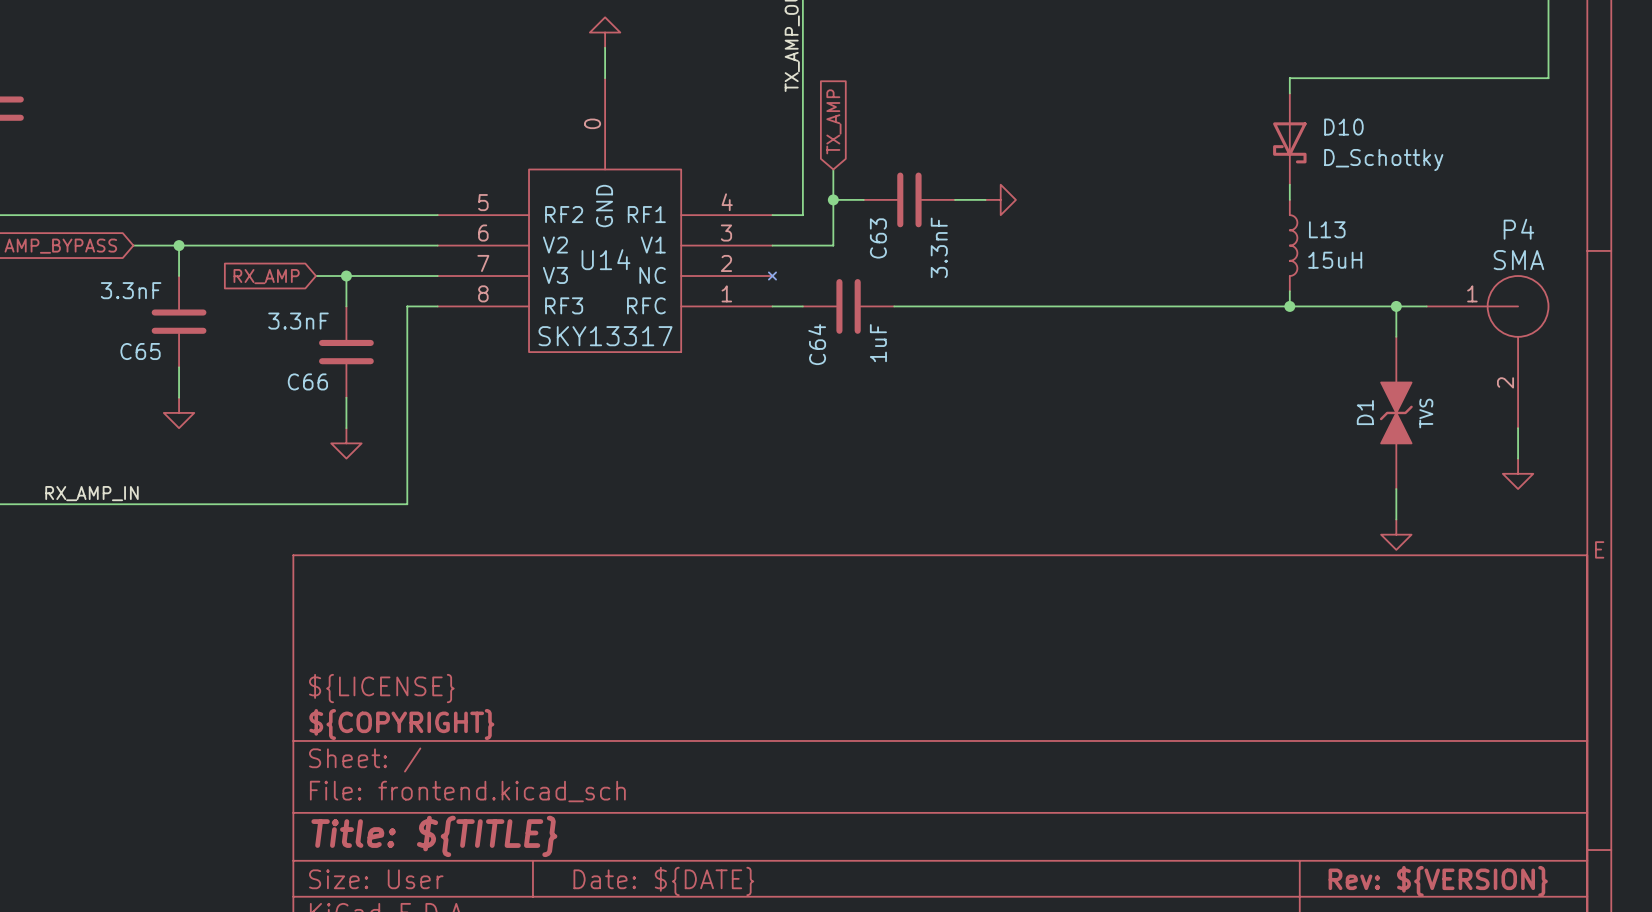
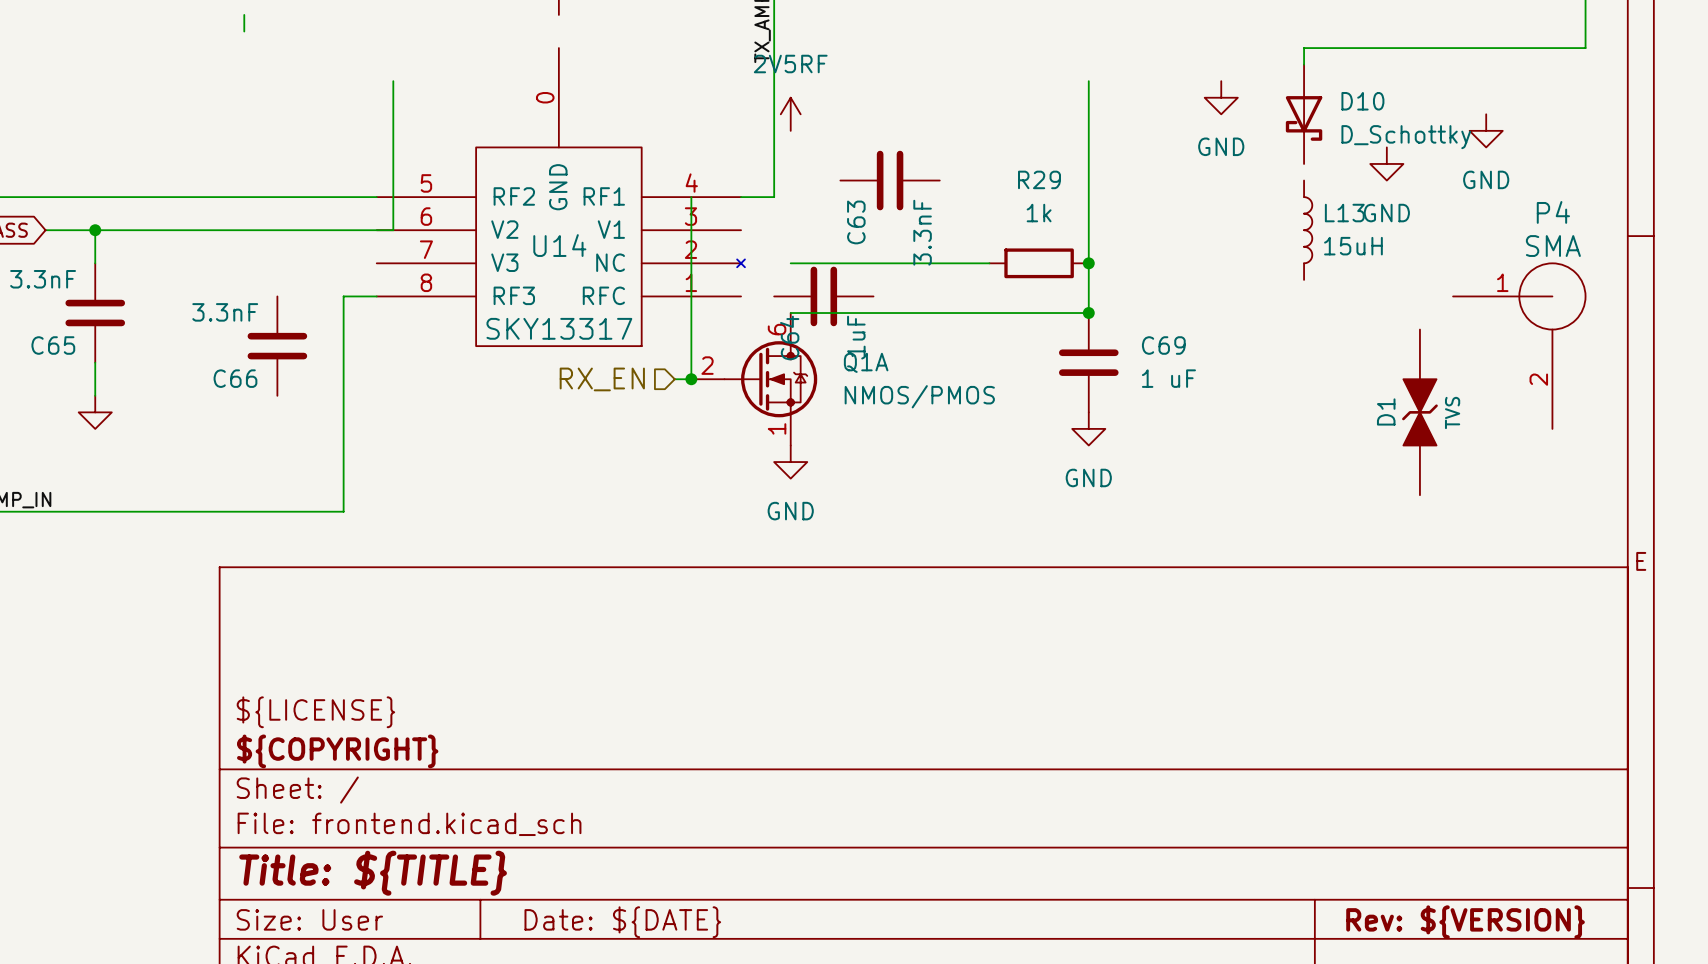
wire: none -> (244, 14) (244, 31)
wire: (605, 47) (605, 78) -> none
wire: none -> (393, 81) (393, 230) (376, 230)
wire: none -> (1088, 81) (1088, 313) (790, 313)
global label: TX_AMP (833, 121) -> none
power symbol: none -> GND (1221, 97)
power symbol: none -> 2V5RF (790, 114)
power symbol: none -> GND (1486, 130)
wire: (833, 169) (833, 245) (772, 245) -> none
wire: (1289, 184) (1289, 199) -> none
power symbol: none -> GND (1386, 163)
wire: (833, 199) (863, 199) -> none
junction: (833, 199) -> none
wire: (955, 199) (985, 199) -> none
power symbol: (1000, 199) -> none
wire: none -> (691, 197) (691, 379) (674, 379)
global label: RX_AMP (266, 276) -> none
wire: (315, 276) (437, 276) -> none
wire: (346, 276) (346, 306) -> none
junction: (346, 276) -> none
wire: none -> (790, 263) (989, 263)
R29: none -> 1k (1039, 263)
junction: none -> (1088, 263)
wire: (1289, 291) (1289, 306) -> none
wire: (772, 306) (802, 306) -> none
wire: (894, 306) (1426, 306) -> none
junction: (1289, 306) -> none
wire: (1396, 306) (1396, 336) -> none
junction: (1396, 306) -> none
junction: none -> (1088, 313)
C69: none -> 1 uF (1088, 362)
hierarchical label: none -> RX_EN (602, 379)
junction: none -> (691, 379)
Q1A: none -> NMOS/PMOS (754, 379)
wire: (346, 397) (346, 428) -> none
power symbol: none -> GND (1088, 428)
wire: (1518, 428) (1518, 458) -> none
power symbol: (346, 443) -> none
power symbol: none -> GND (790, 462)
power symbol: (1518, 473) -> none
wire: (1396, 489) (1396, 519) -> none
power symbol: (1396, 534) -> none

